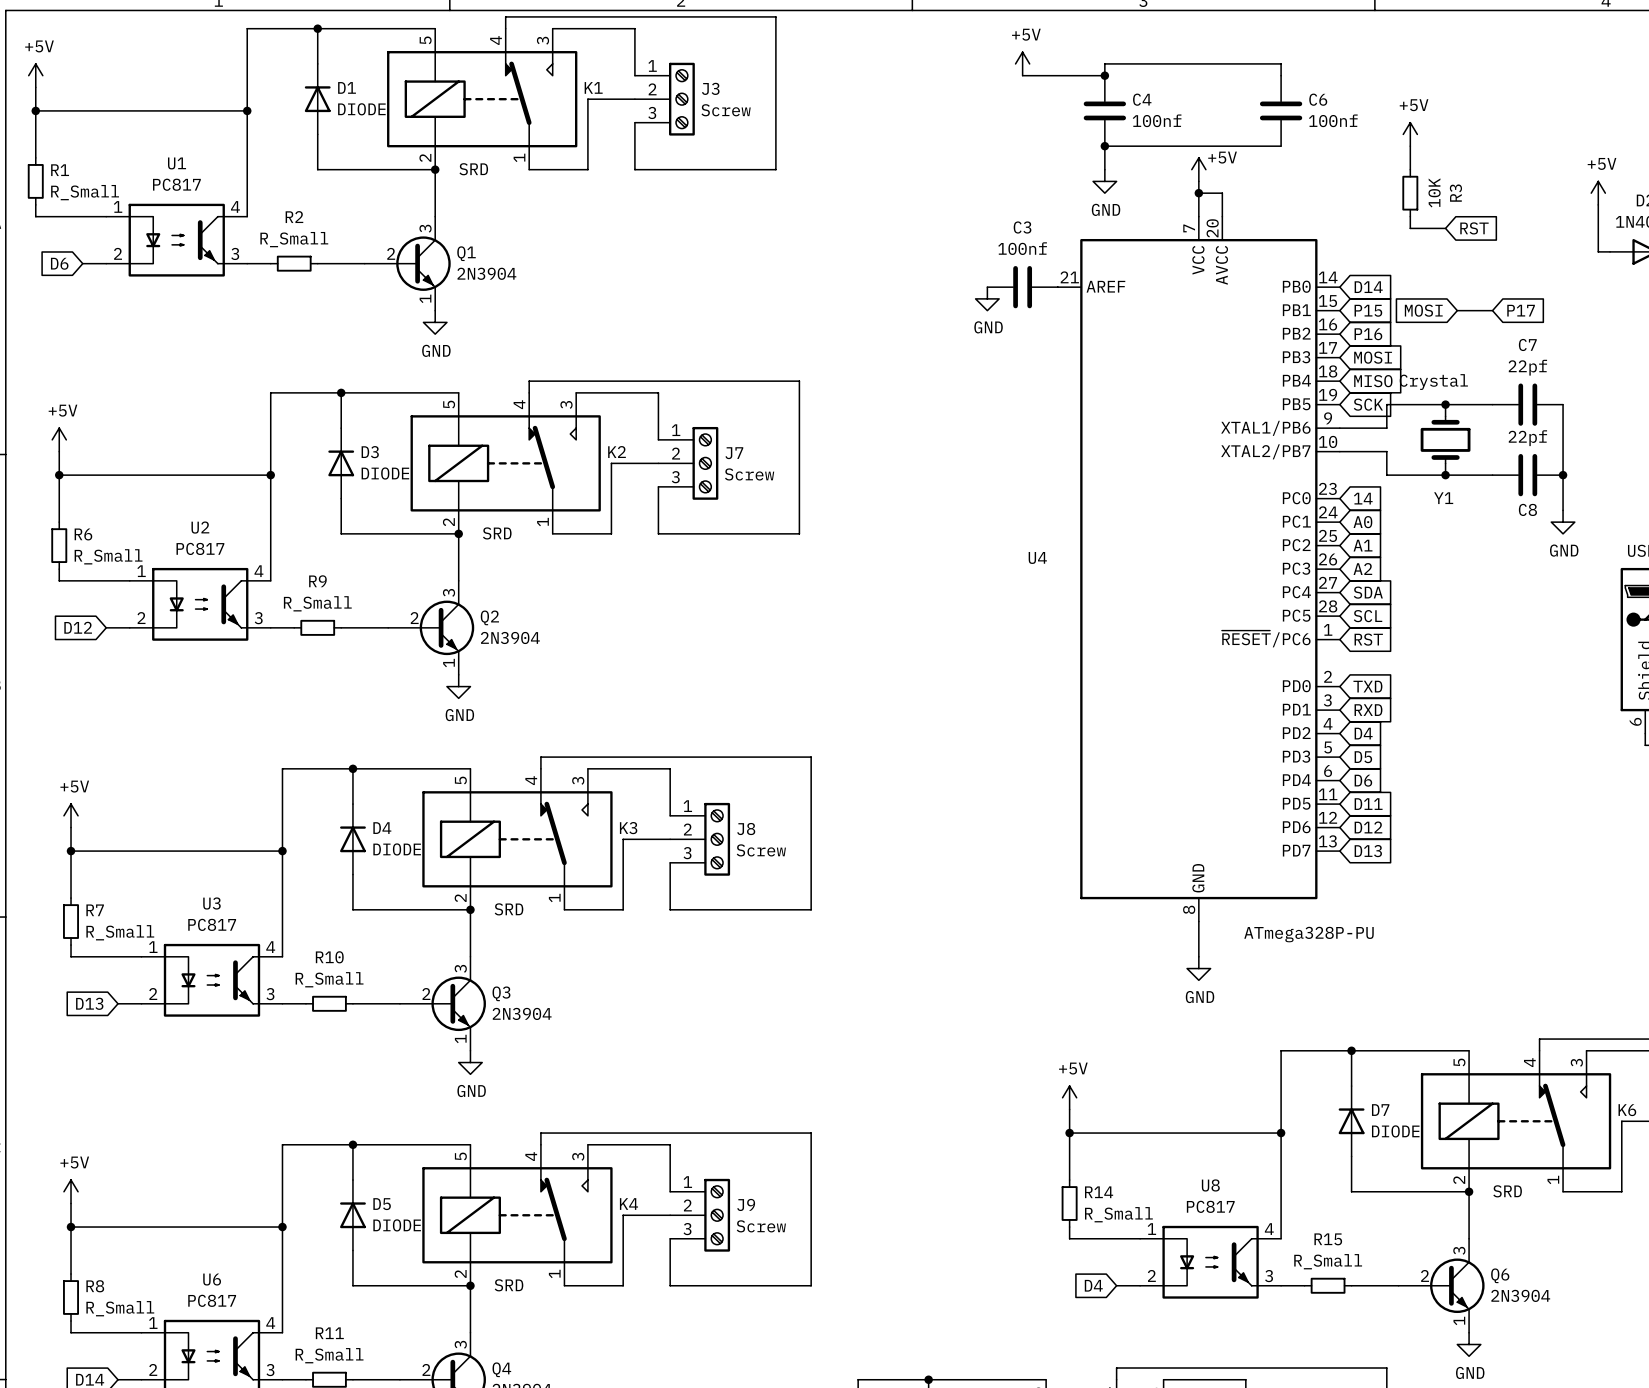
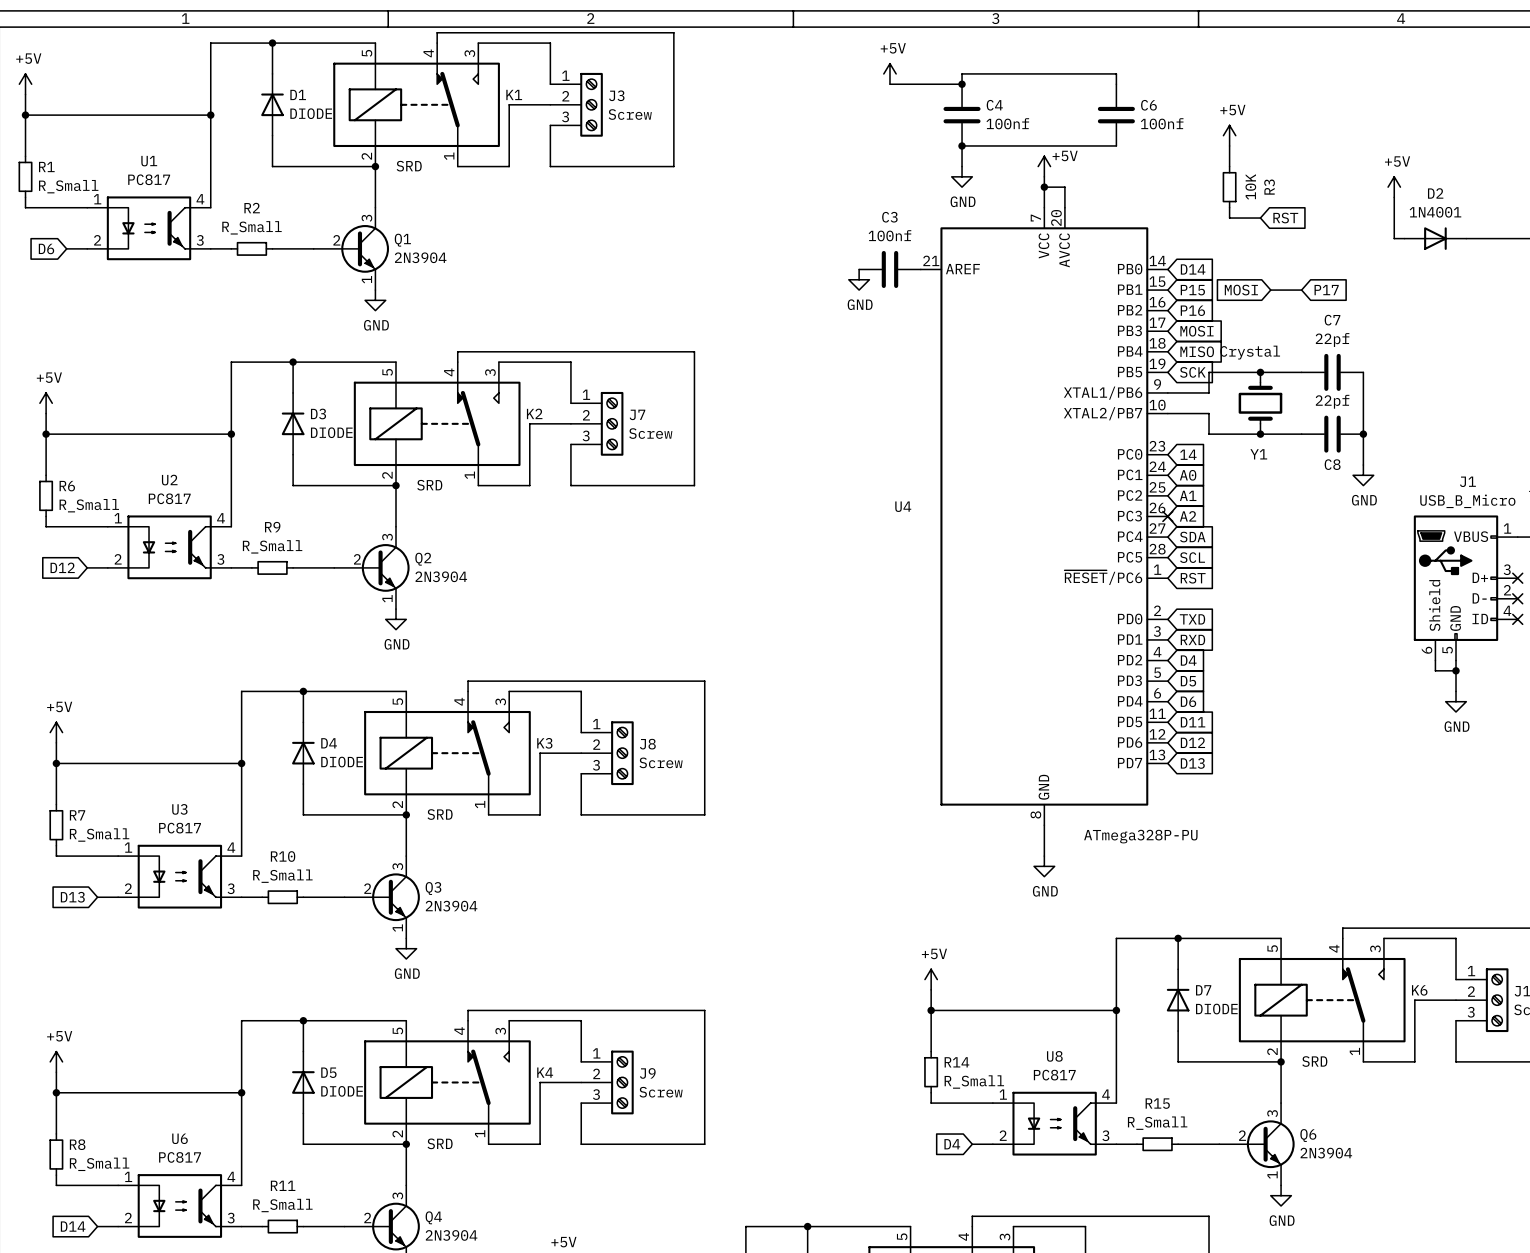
no-connect mark: none -> (1167, 516)

